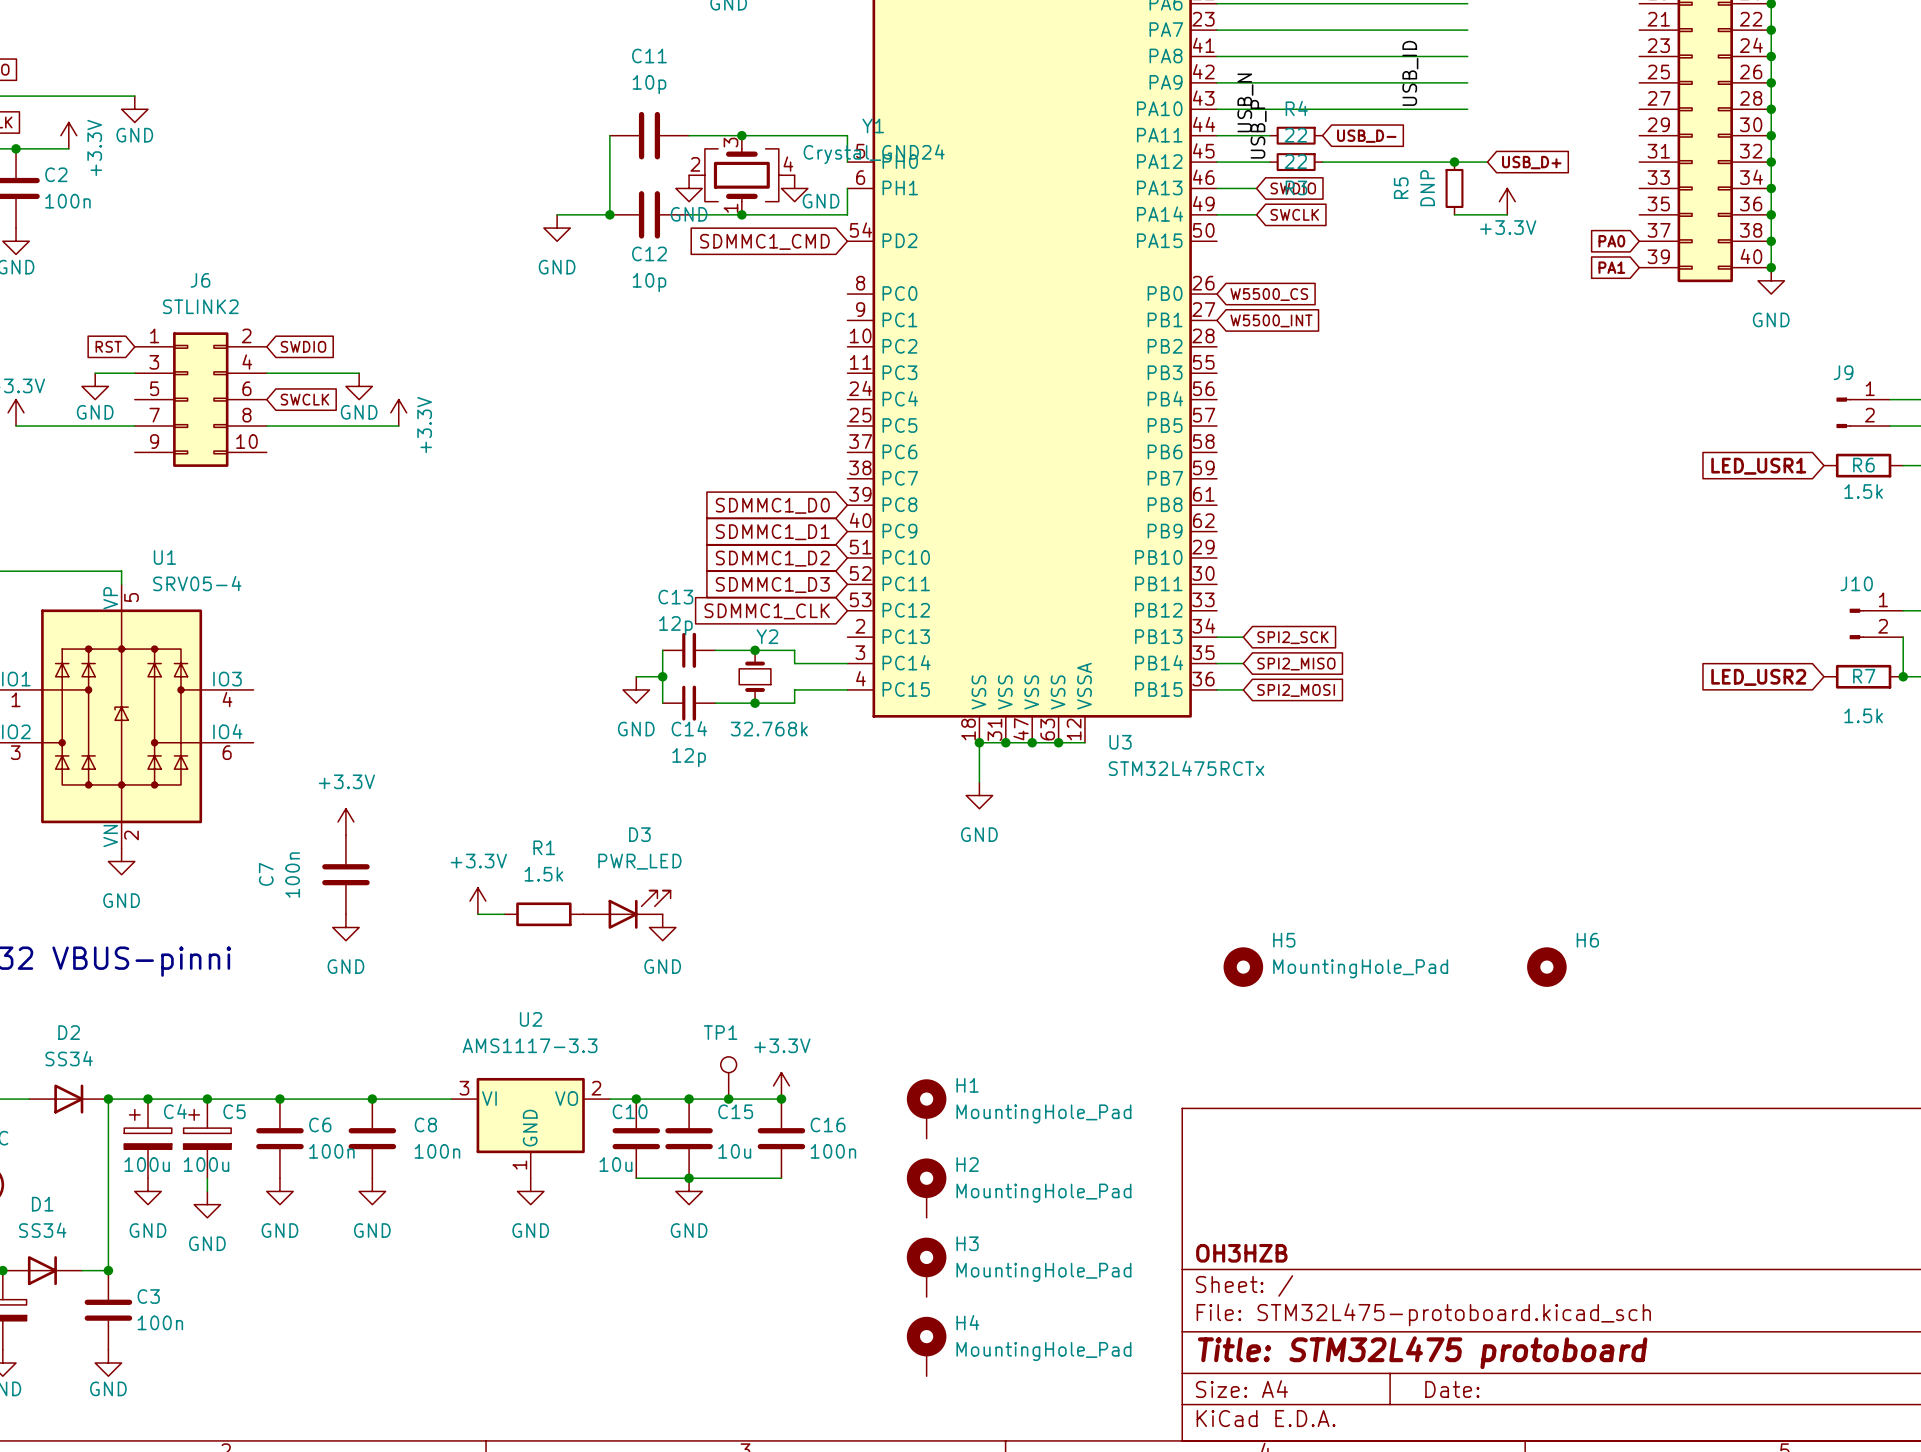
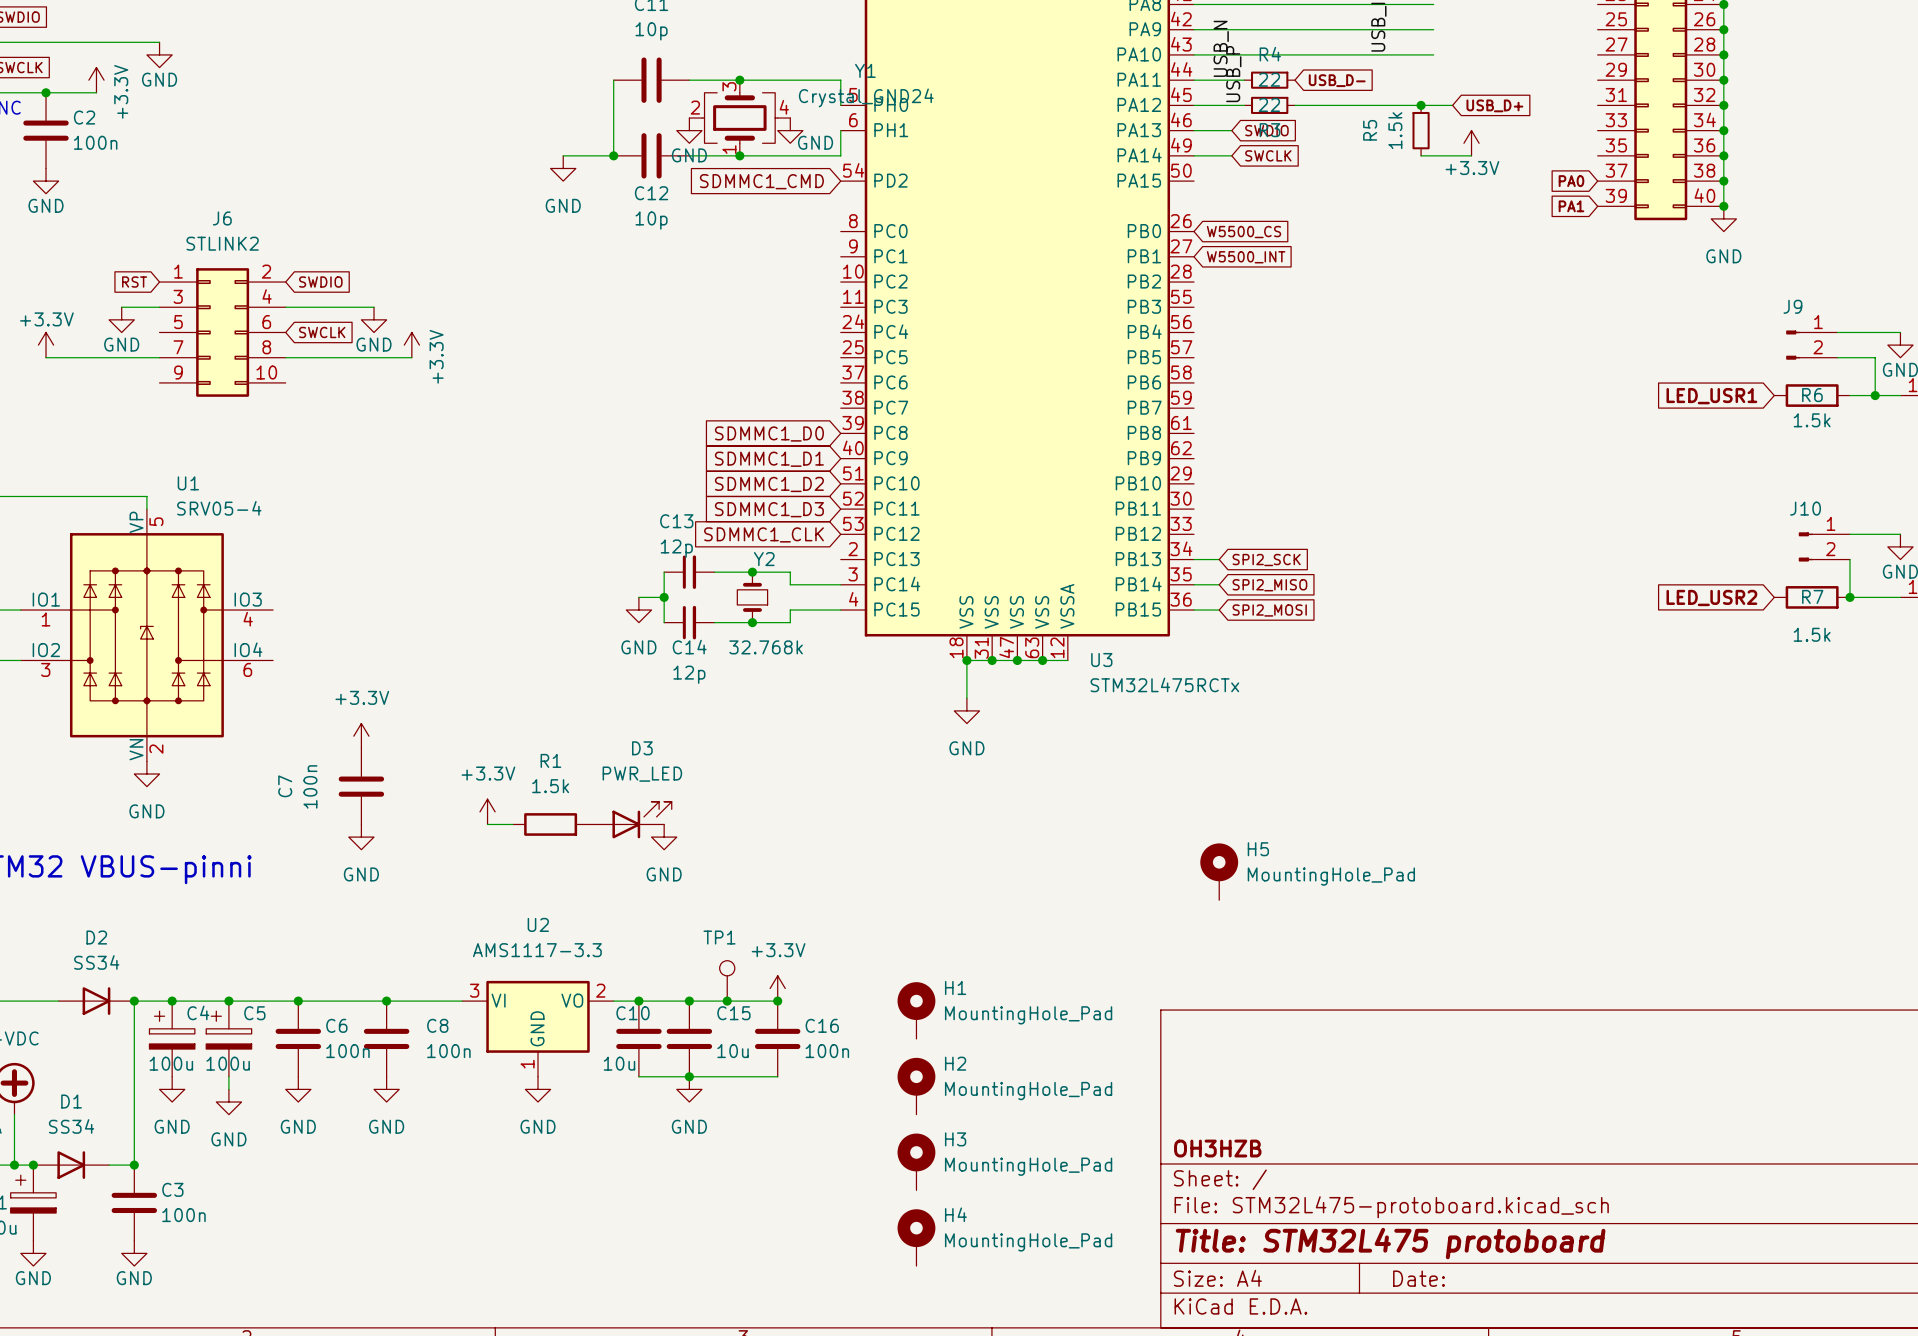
R5 value: DNP (1427, 188) -> 1.5k (1395, 130)
H5 symbol: [1223, 947, 1264, 987] -> [1200, 843, 1239, 901]
H6: (1546, 967) -> none

